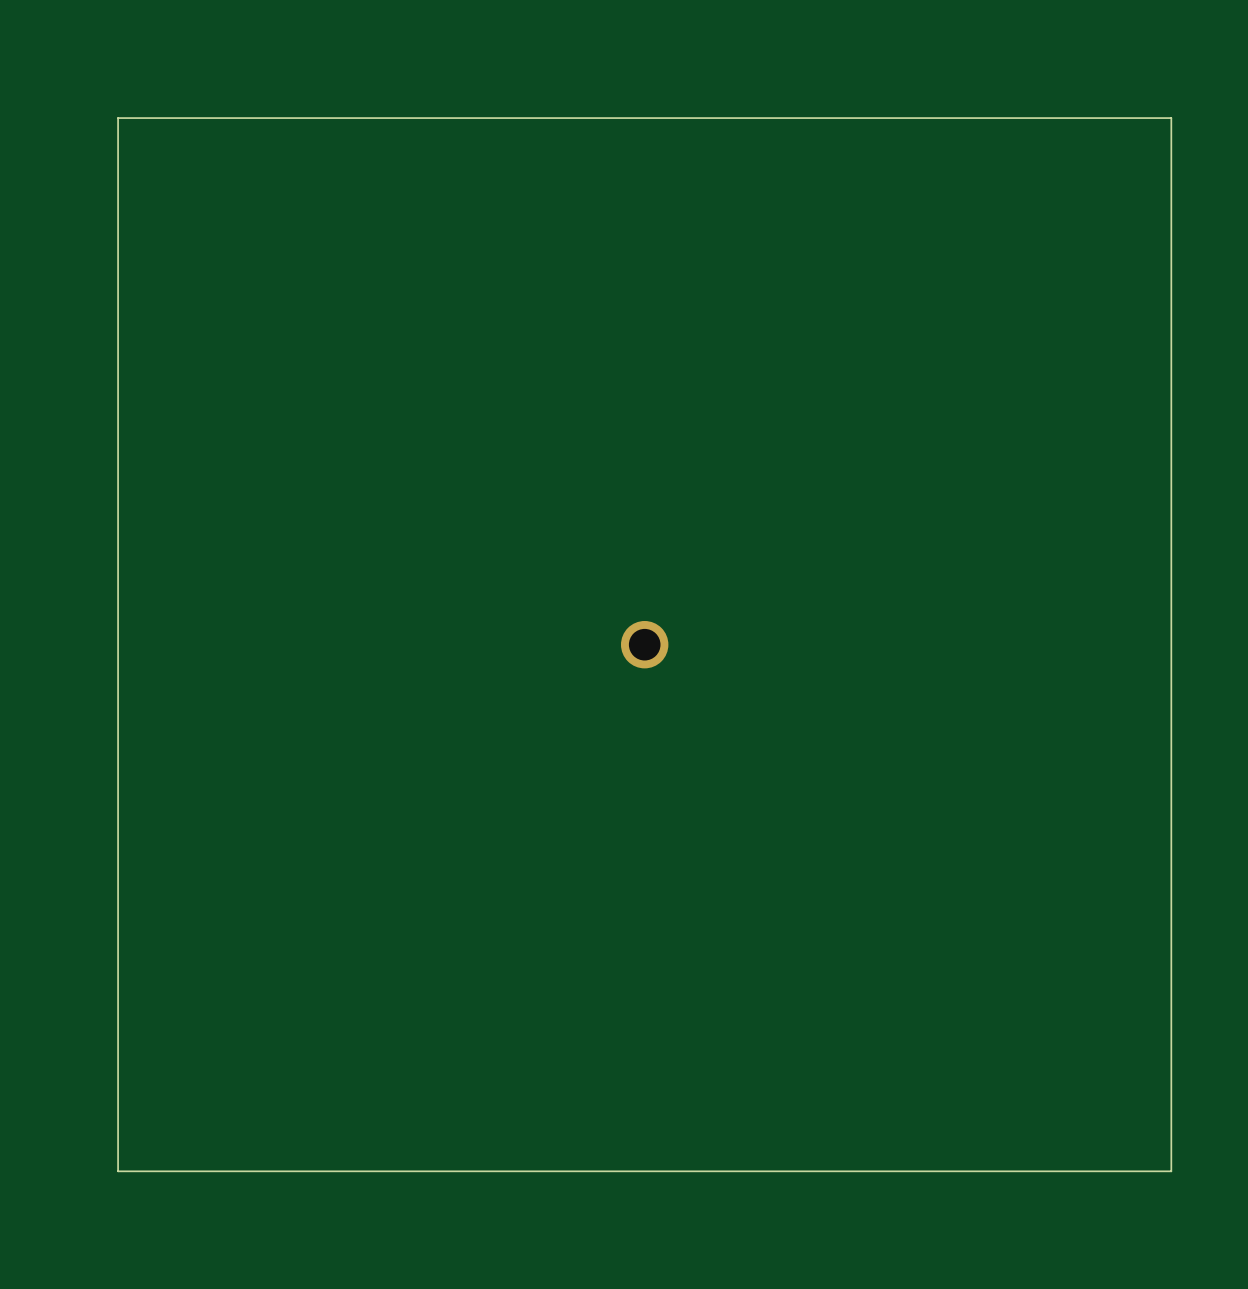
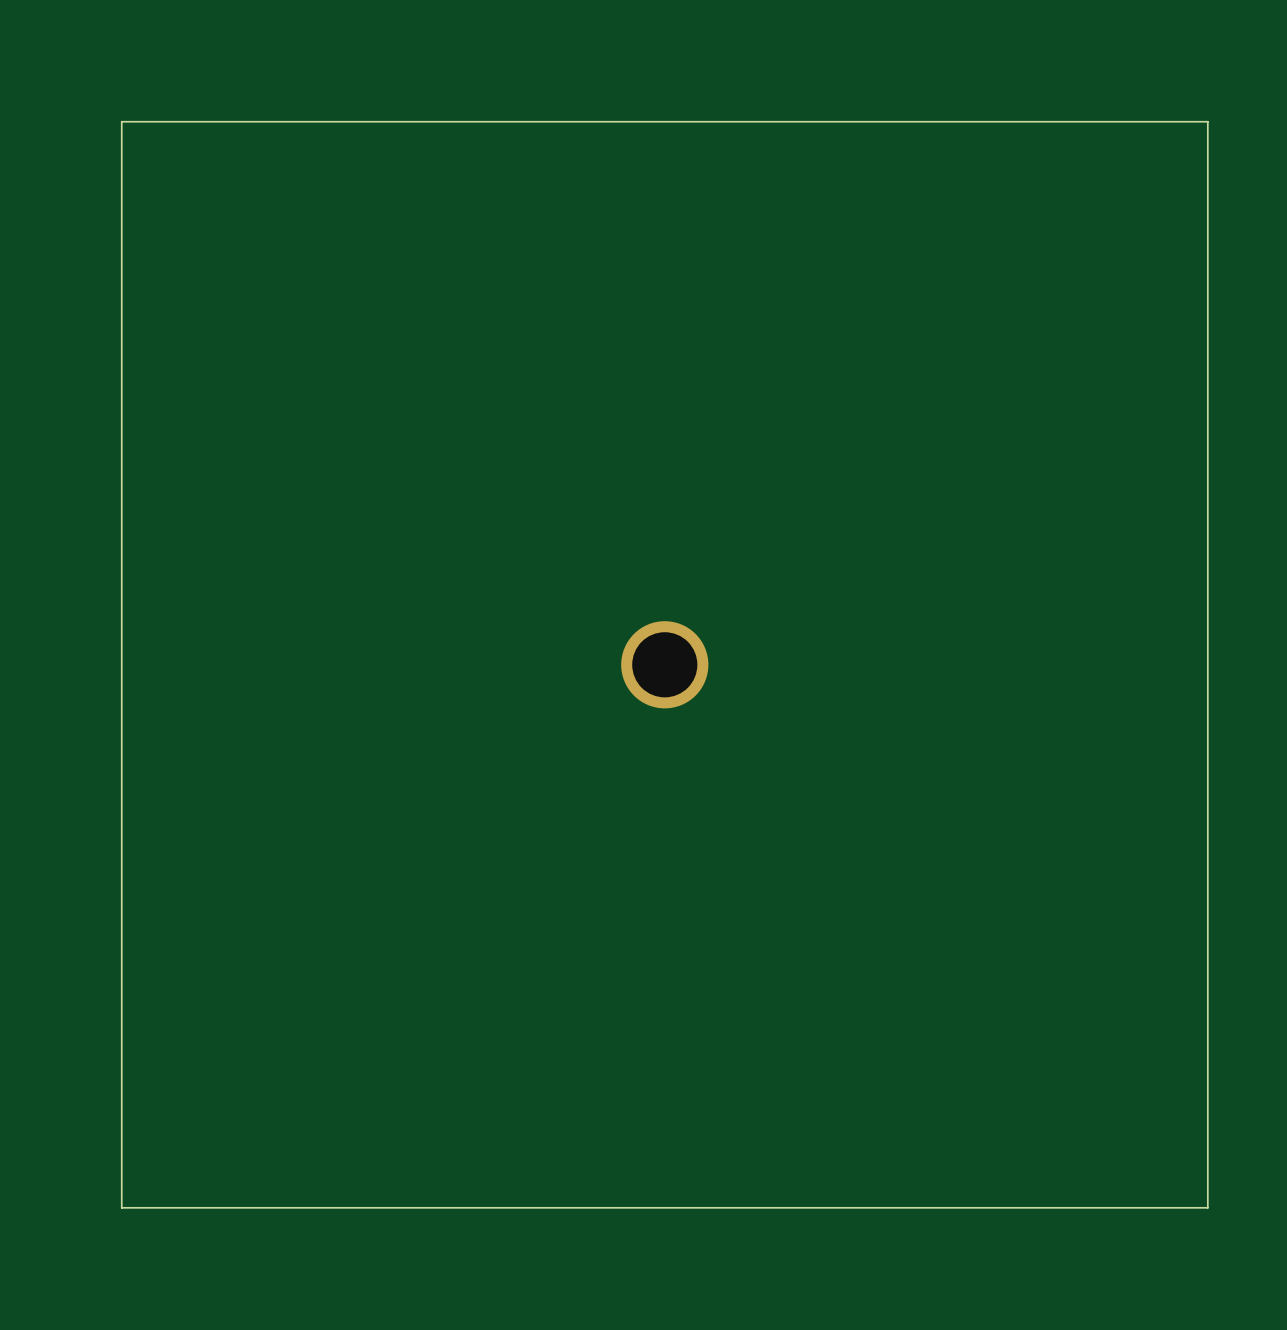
via size: [620, 620, 669, 669] -> [621, 621, 709, 709]

